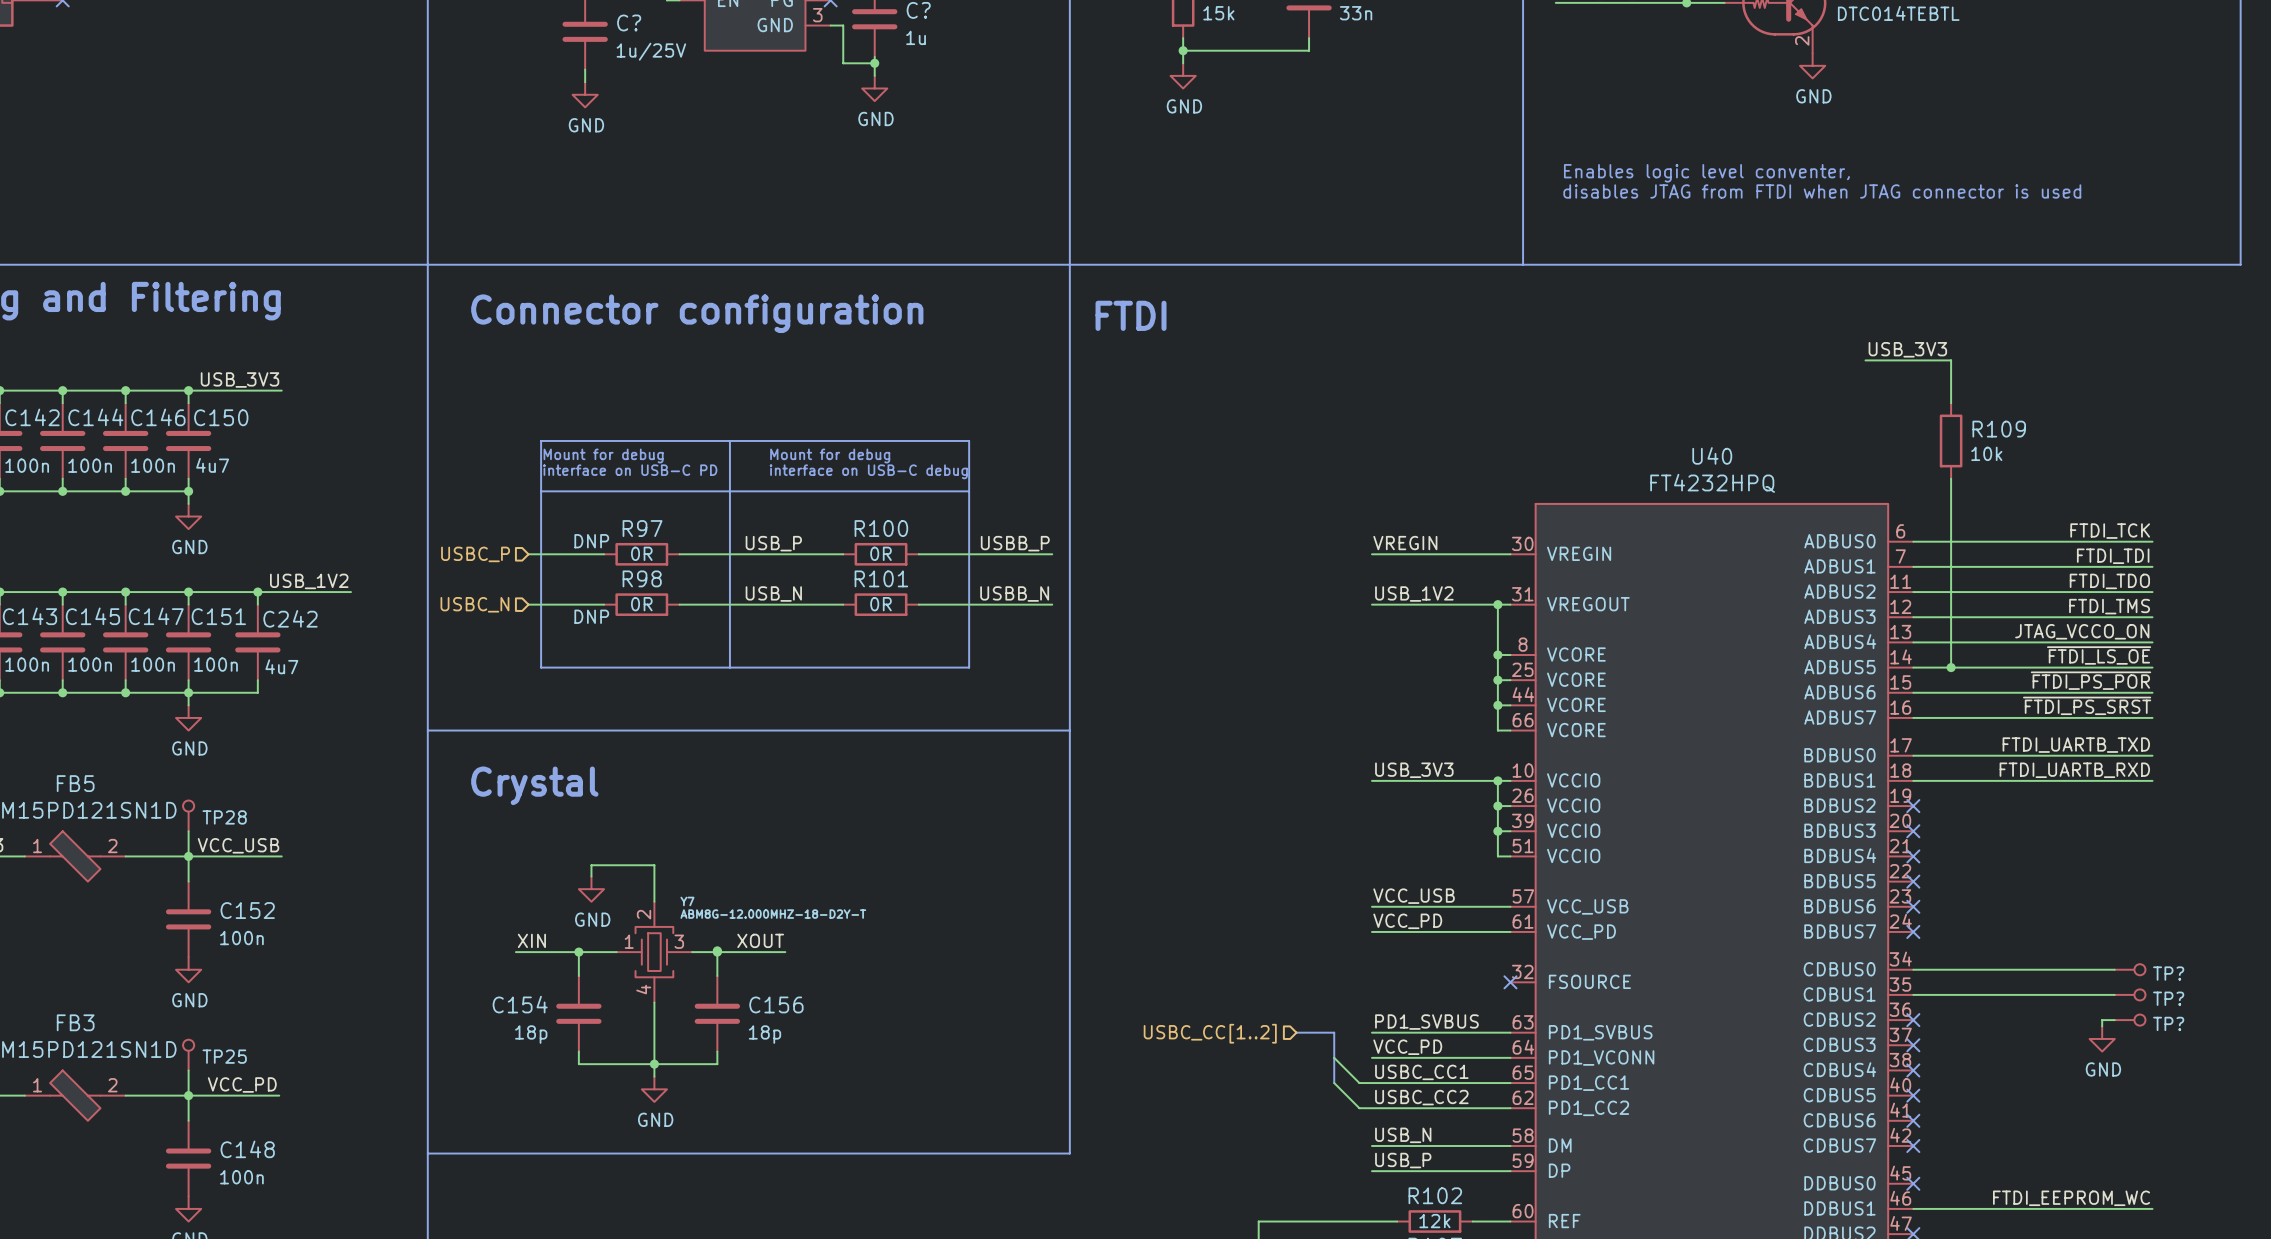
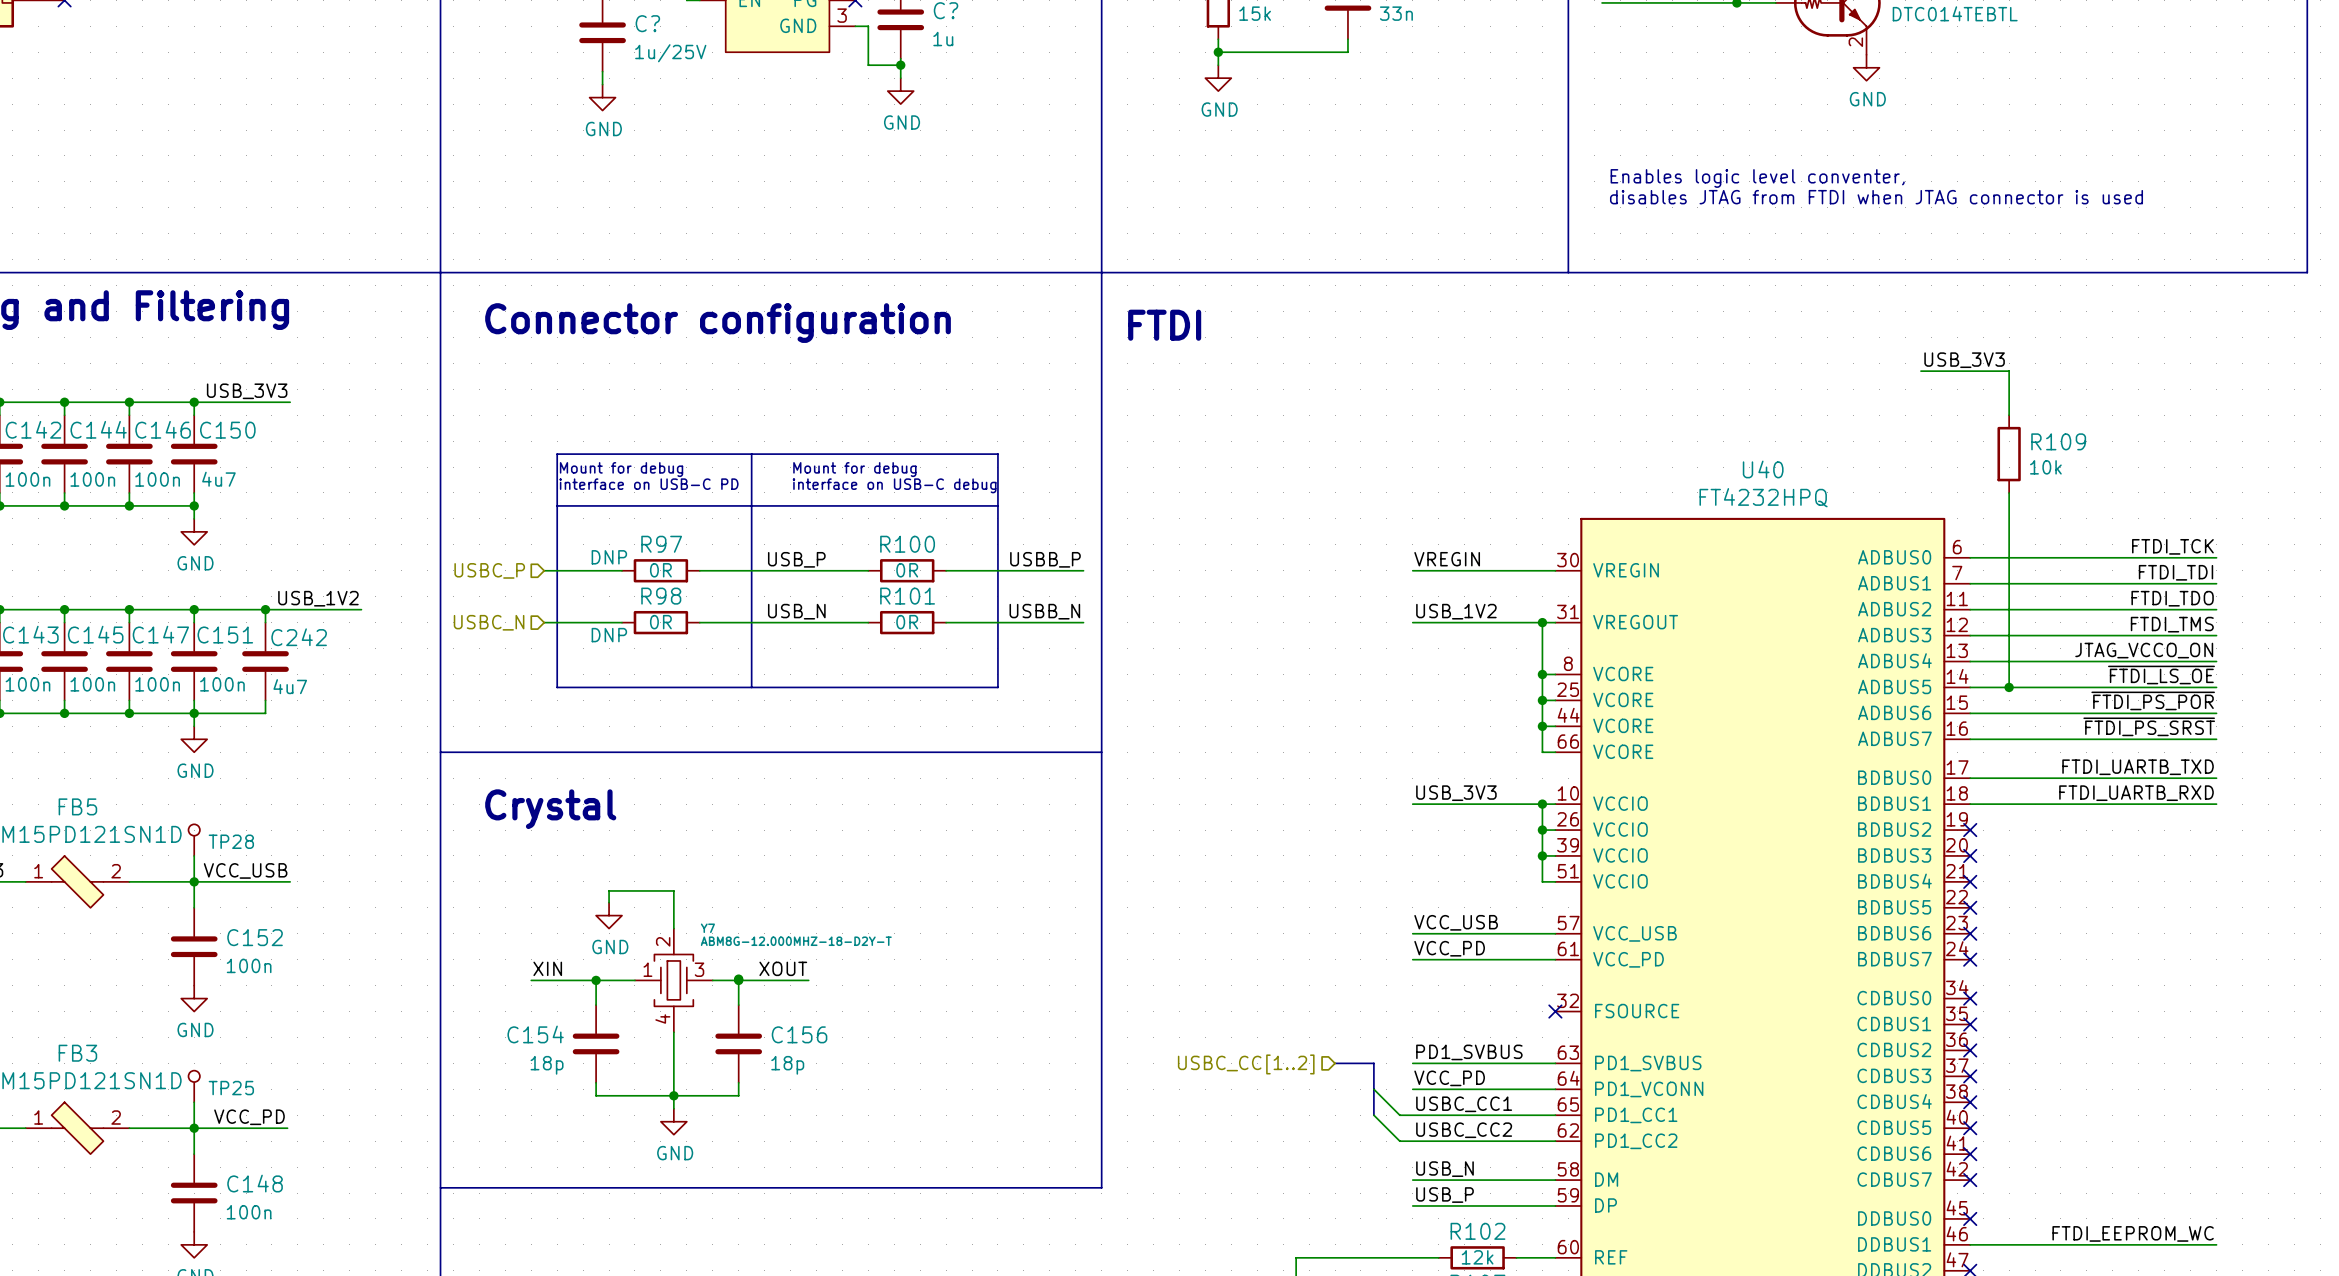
wire: (1913, 969) (2114, 969) -> none
no-connect mark: none -> (1970, 998)
TP?: (2130, 969) -> none
wire: (1913, 994) (2114, 994) -> none
no-connect mark: none -> (1970, 1024)
TP?: (2130, 994) -> none
wire: (2114, 1020) (2102, 1020) (2102, 1026) -> none
TP?: (2130, 1020) -> none
power symbol: GND (2102, 1038) -> none

